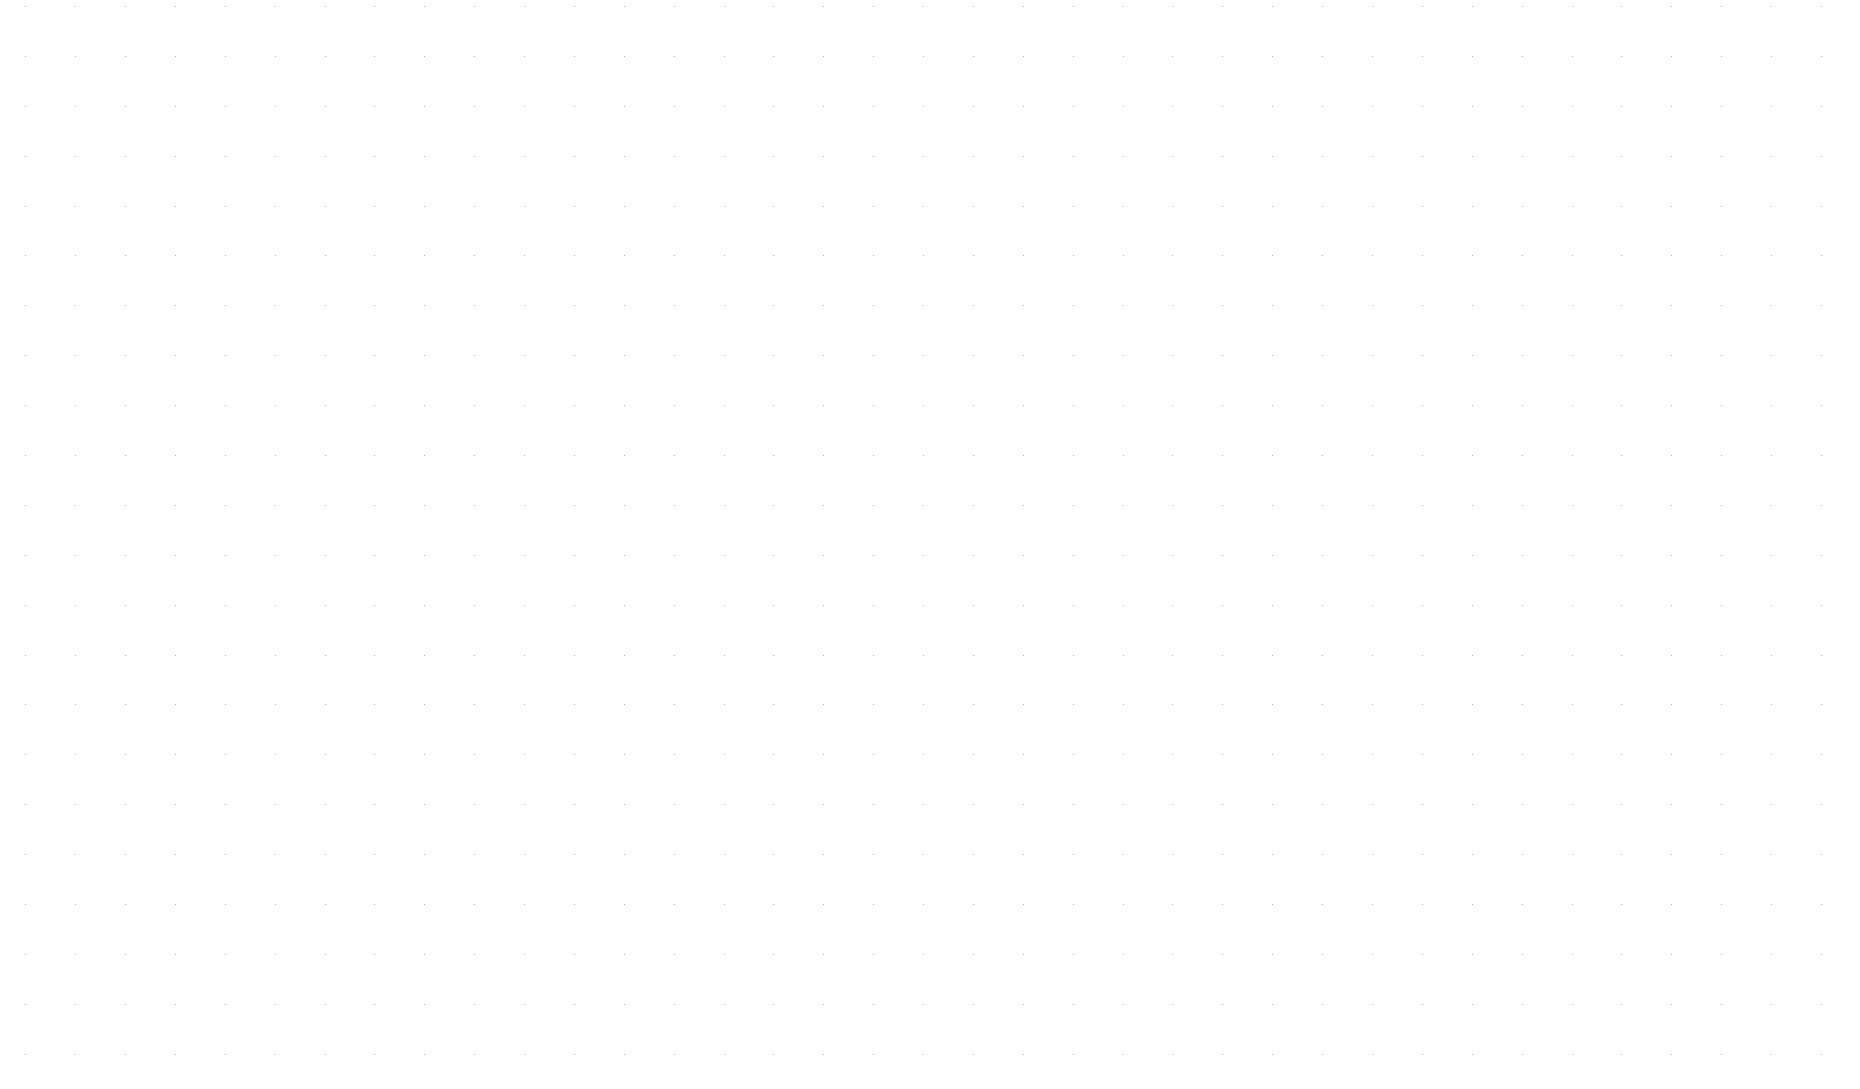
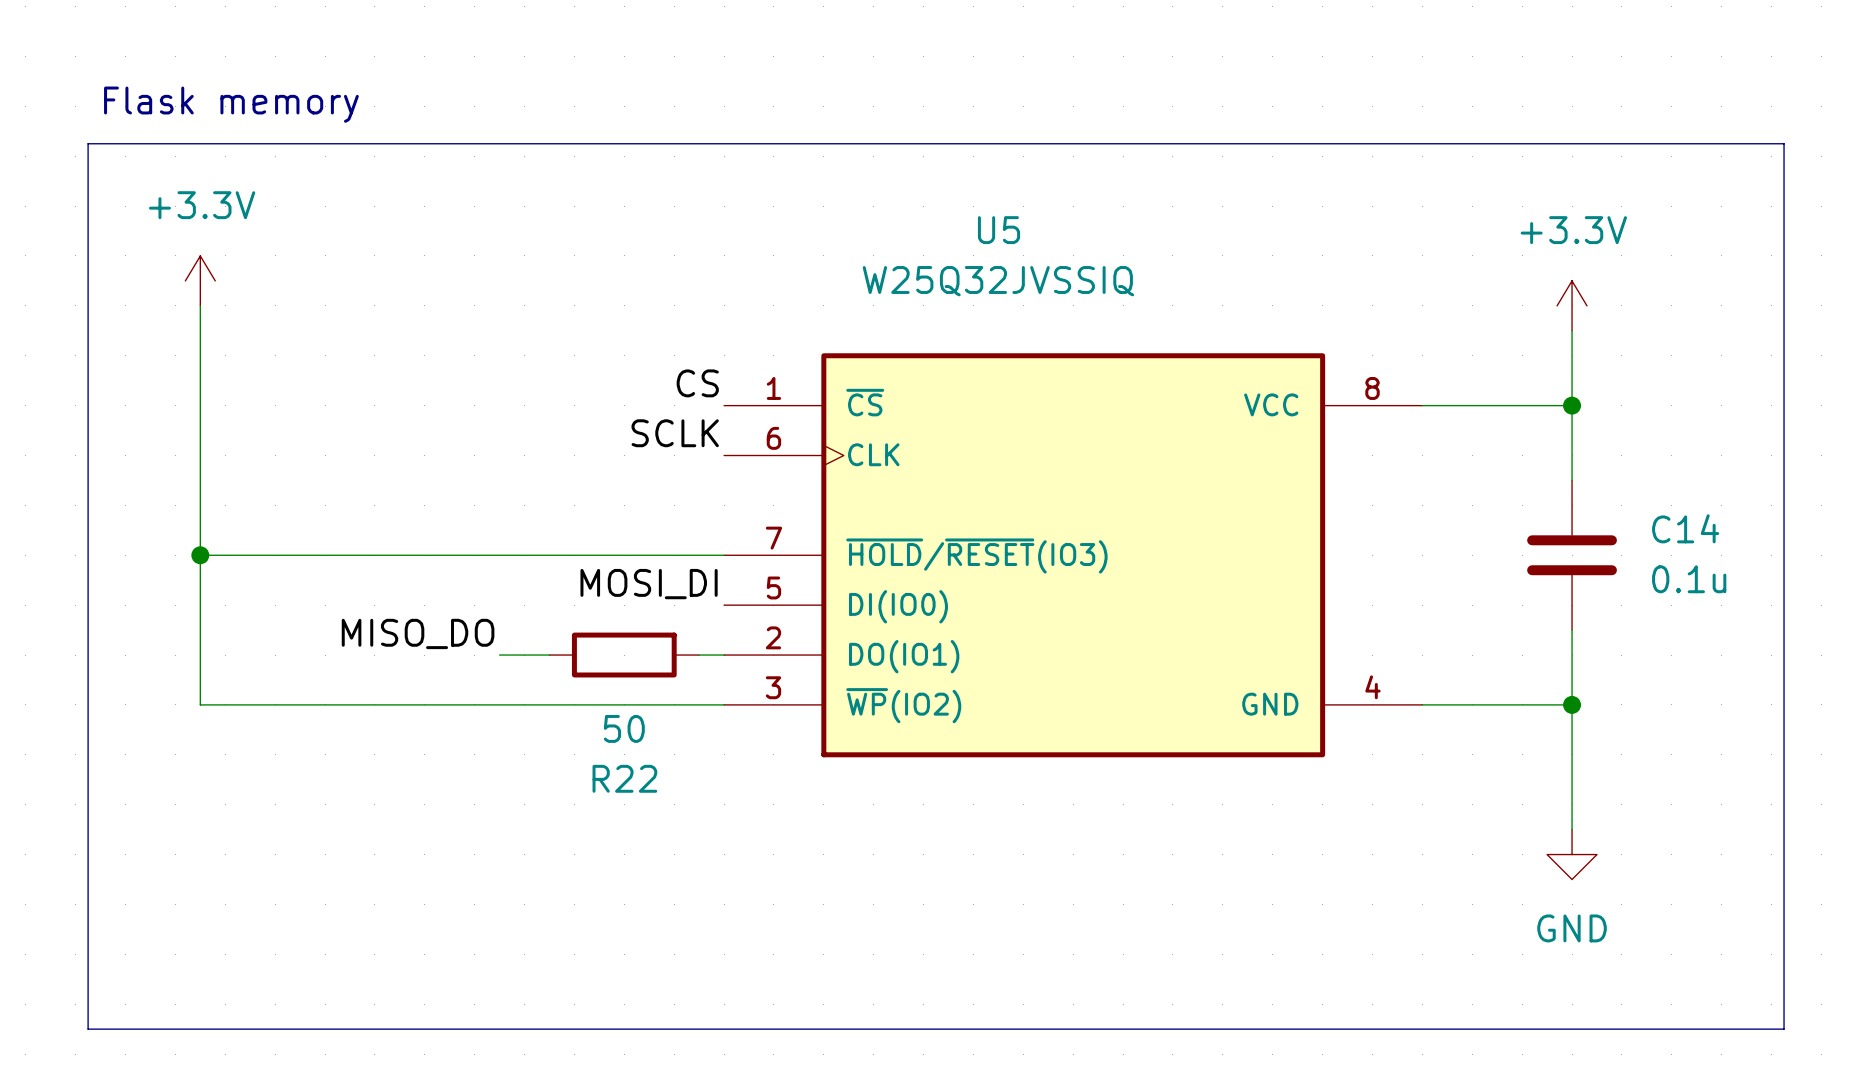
text: none -> Flask memory (231, 104)
line: none -> (88, 143) (1784, 143) (1784, 1029) (88, 1029) (88, 143)
power symbol: none -> +3.3V (200, 280)
wire: none -> (200, 305) (200, 704) (724, 704)
power symbol: none -> +3.3V (1572, 305)
wire: none -> (1572, 330) (1572, 480)
label: none -> CS (697, 383)
wire: none -> (1422, 405) (1572, 405)
junction: none -> (1572, 405)
label: none -> SCLK (675, 433)
wire: none -> (200, 555) (724, 555)
junction: none -> (200, 555)
U5: none -> W25Q32JVSSIQ (1073, 555)
C14: none -> 0.1u (1572, 555)
label: none -> MOSI_DI (649, 584)
wire: none -> (1572, 630) (1572, 829)
label: none -> MISO_DO (418, 633)
wire: none -> (499, 655) (549, 655)
R22: none -> 50 (624, 655)
wire: none -> (699, 655) (724, 655)
wire: none -> (1422, 704) (1572, 704)
junction: none -> (1572, 704)
power symbol: none -> GND (1572, 854)

